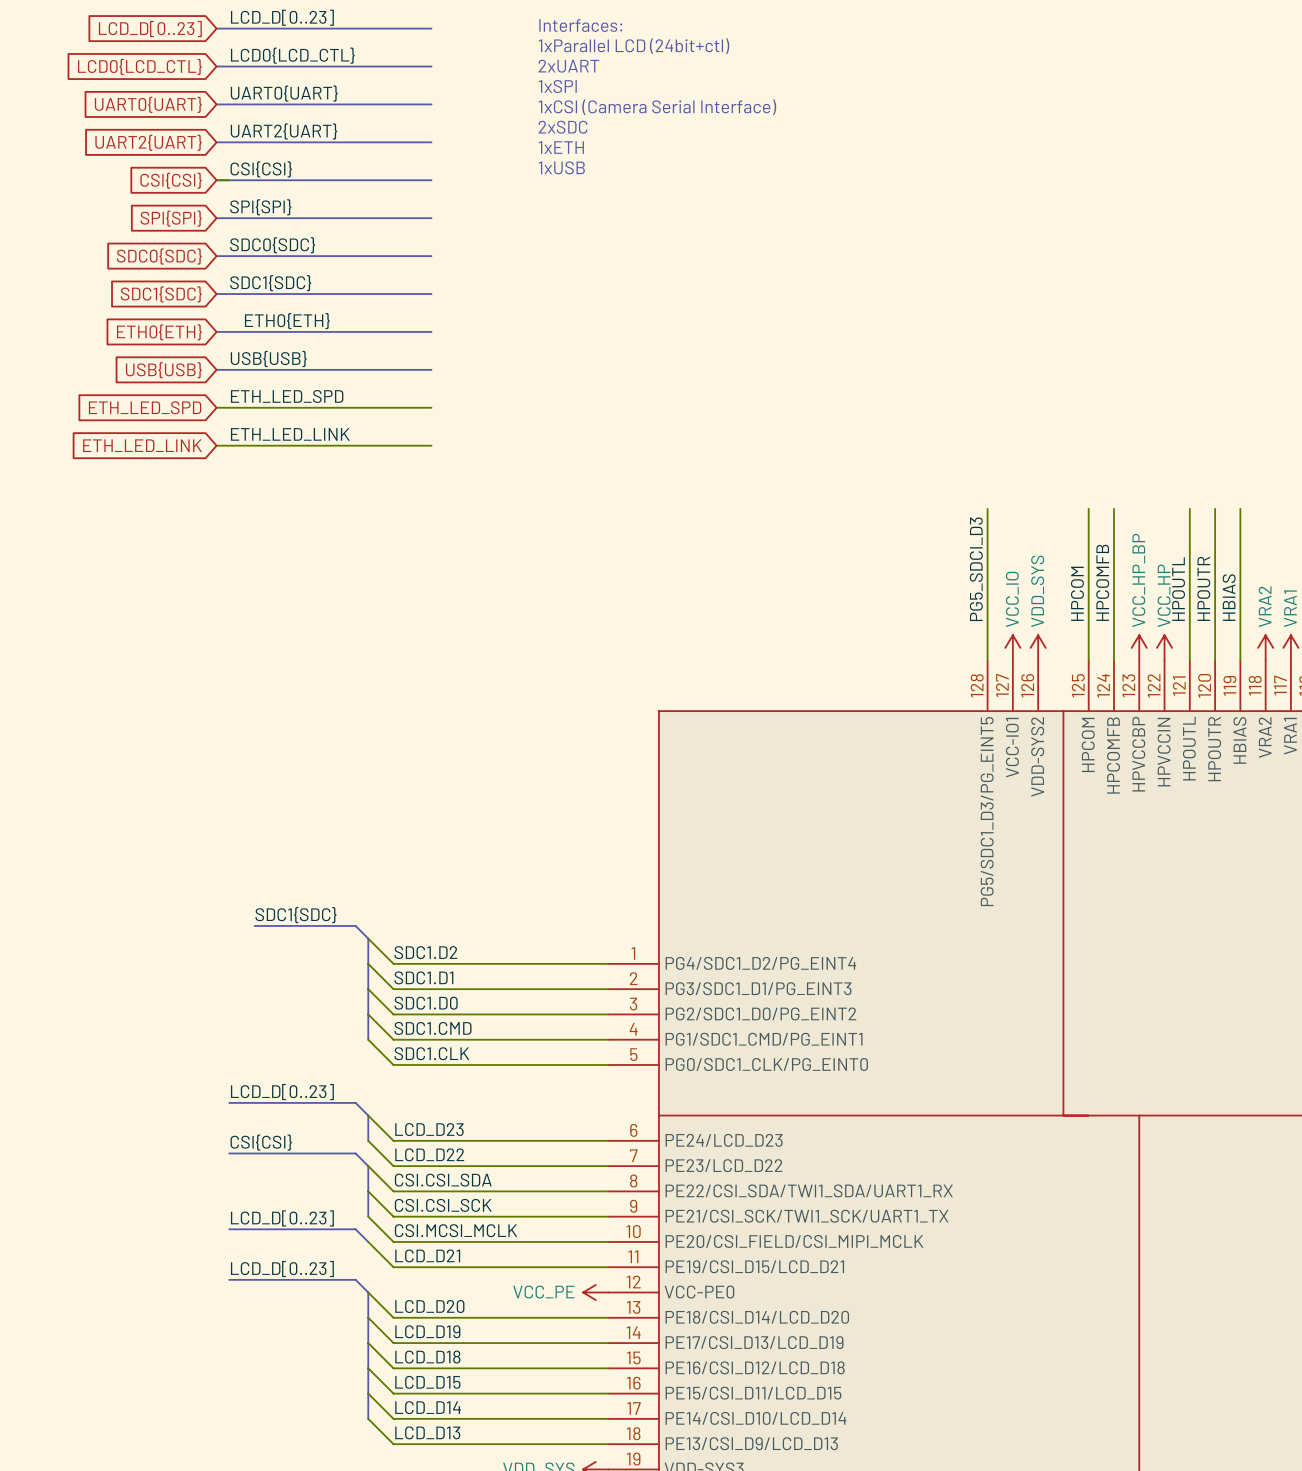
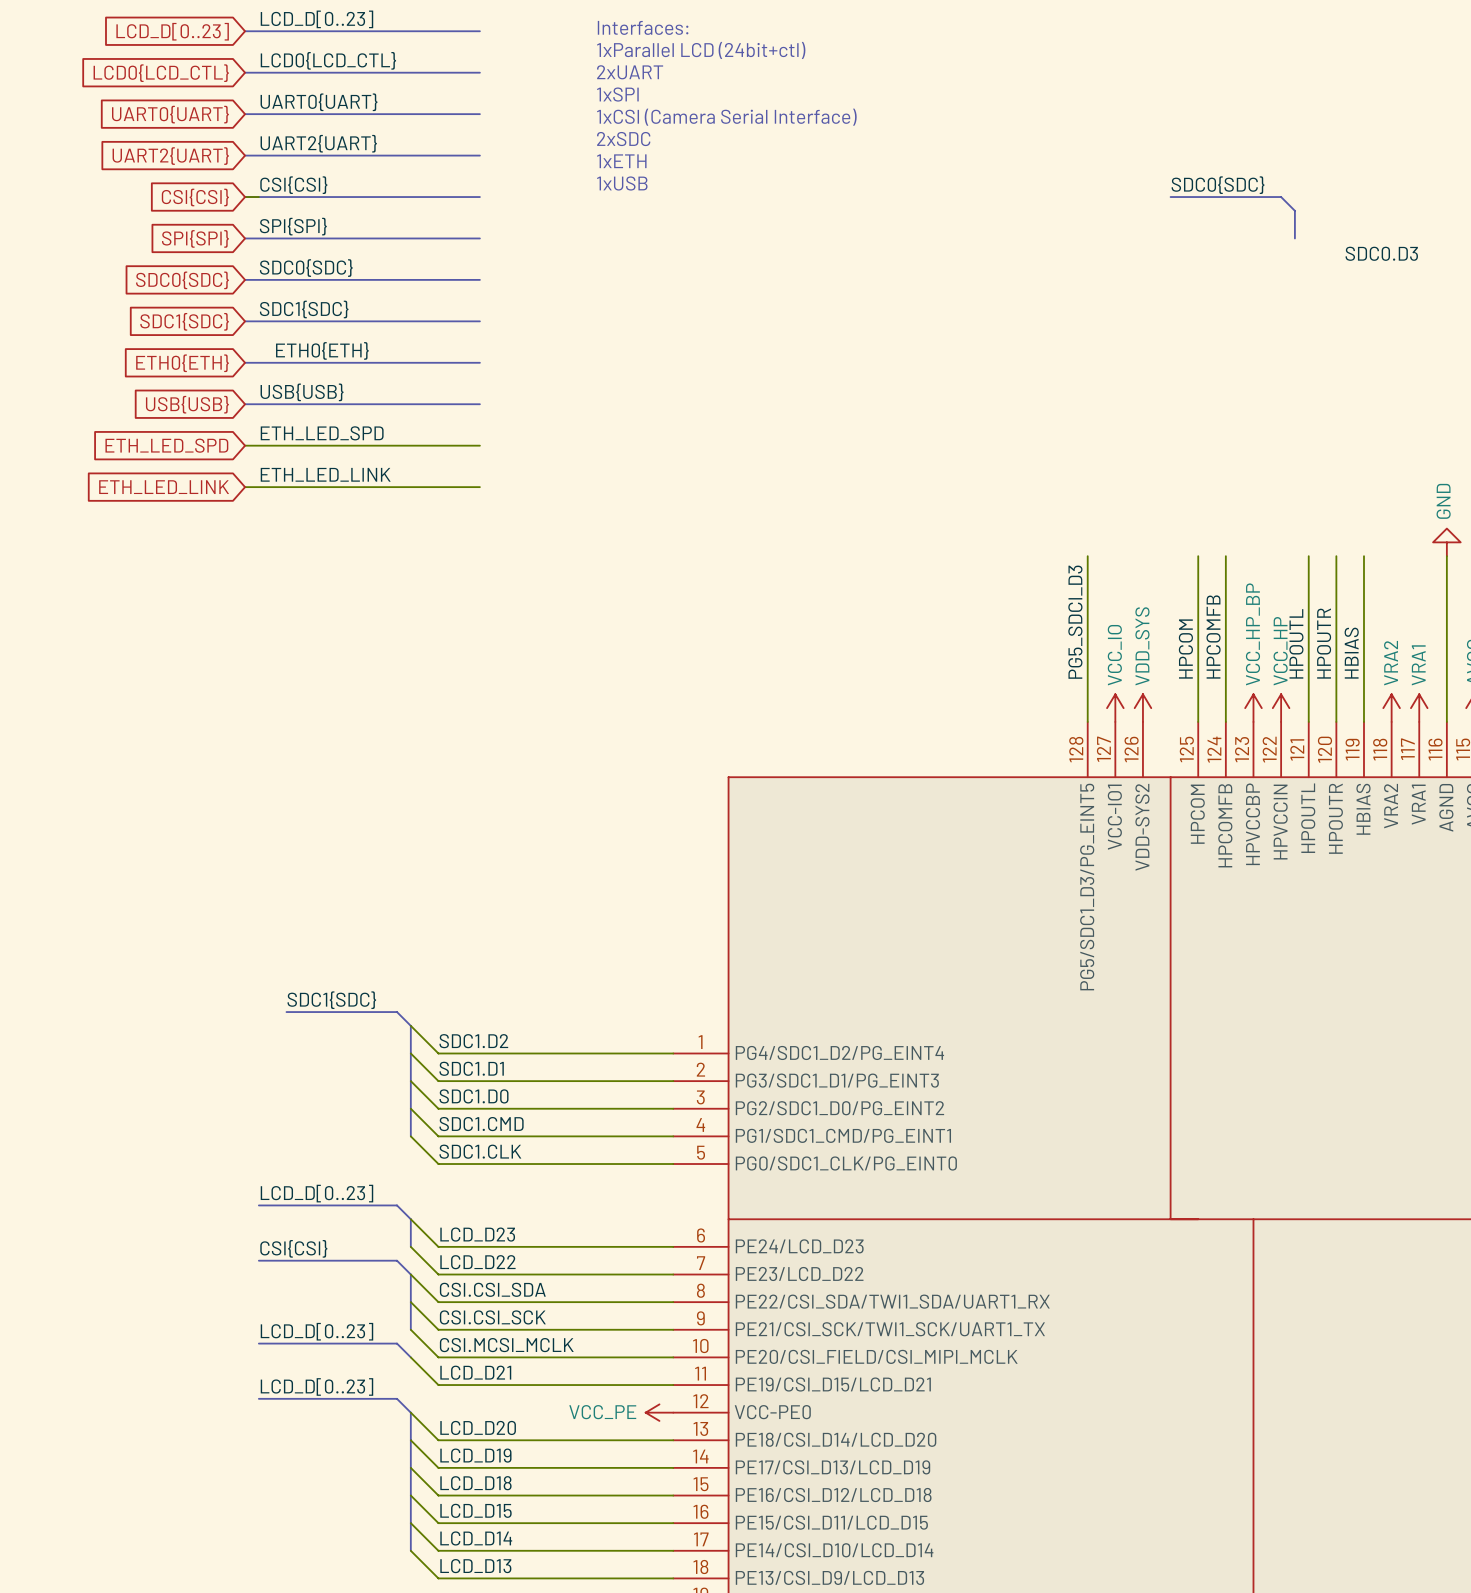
label: none -> SDC0{SDC} (1218, 185)
bus: none -> (1170, 197) (1281, 197) (1294, 210) (1294, 238)
label: none -> SDC0.D3 (1381, 253)

